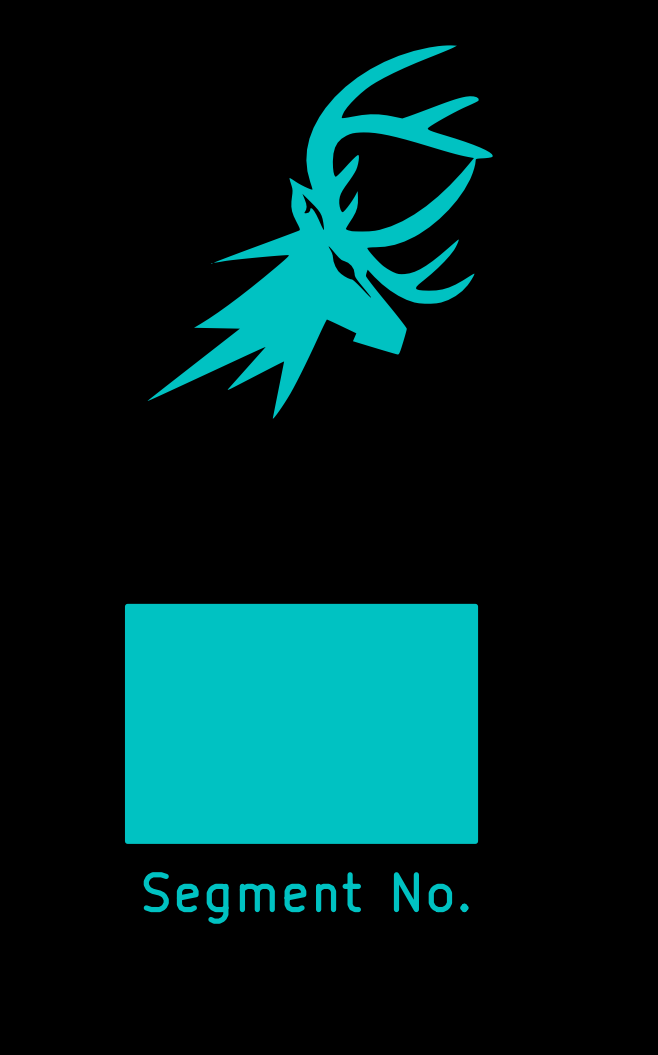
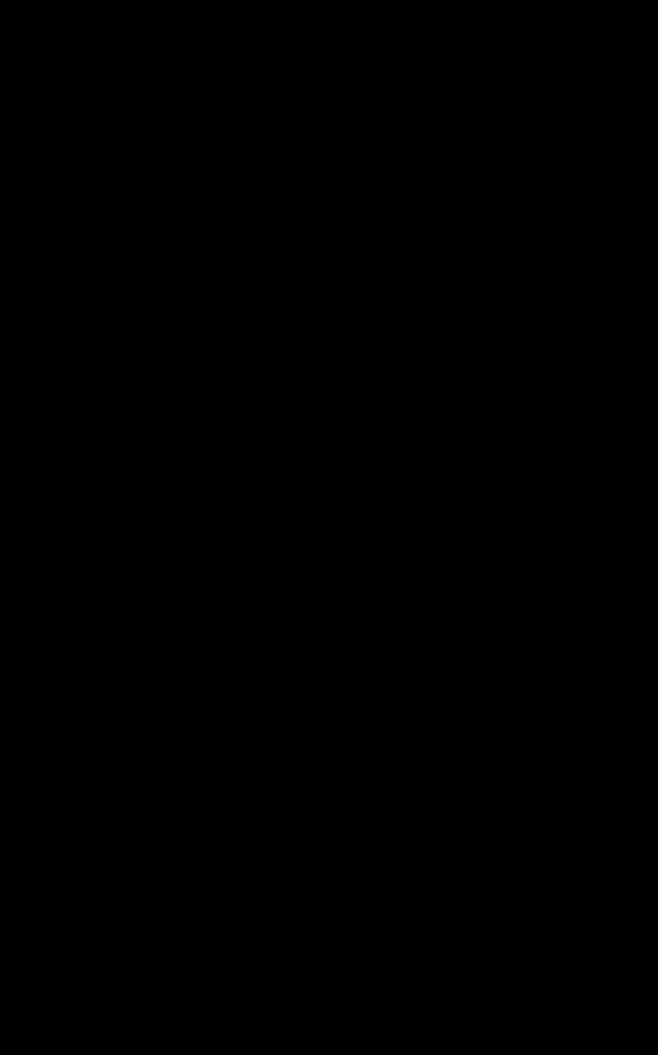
drawing: [147, 45, 493, 419] -> none
drawing: [124, 603, 479, 844] -> none
text: Segment No. (306, 897) -> none

